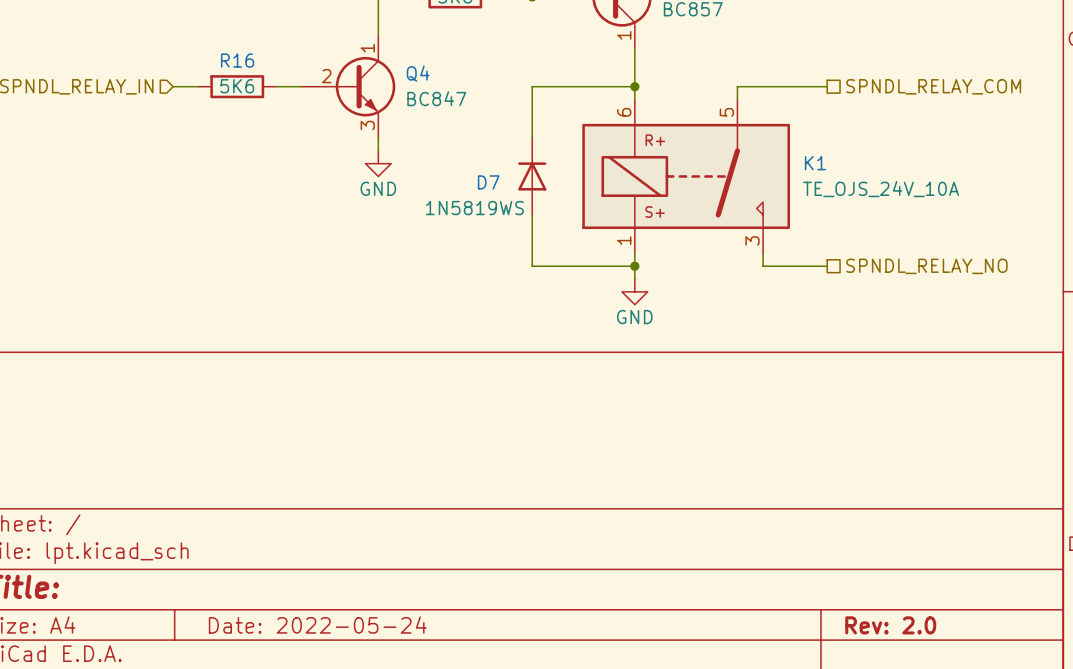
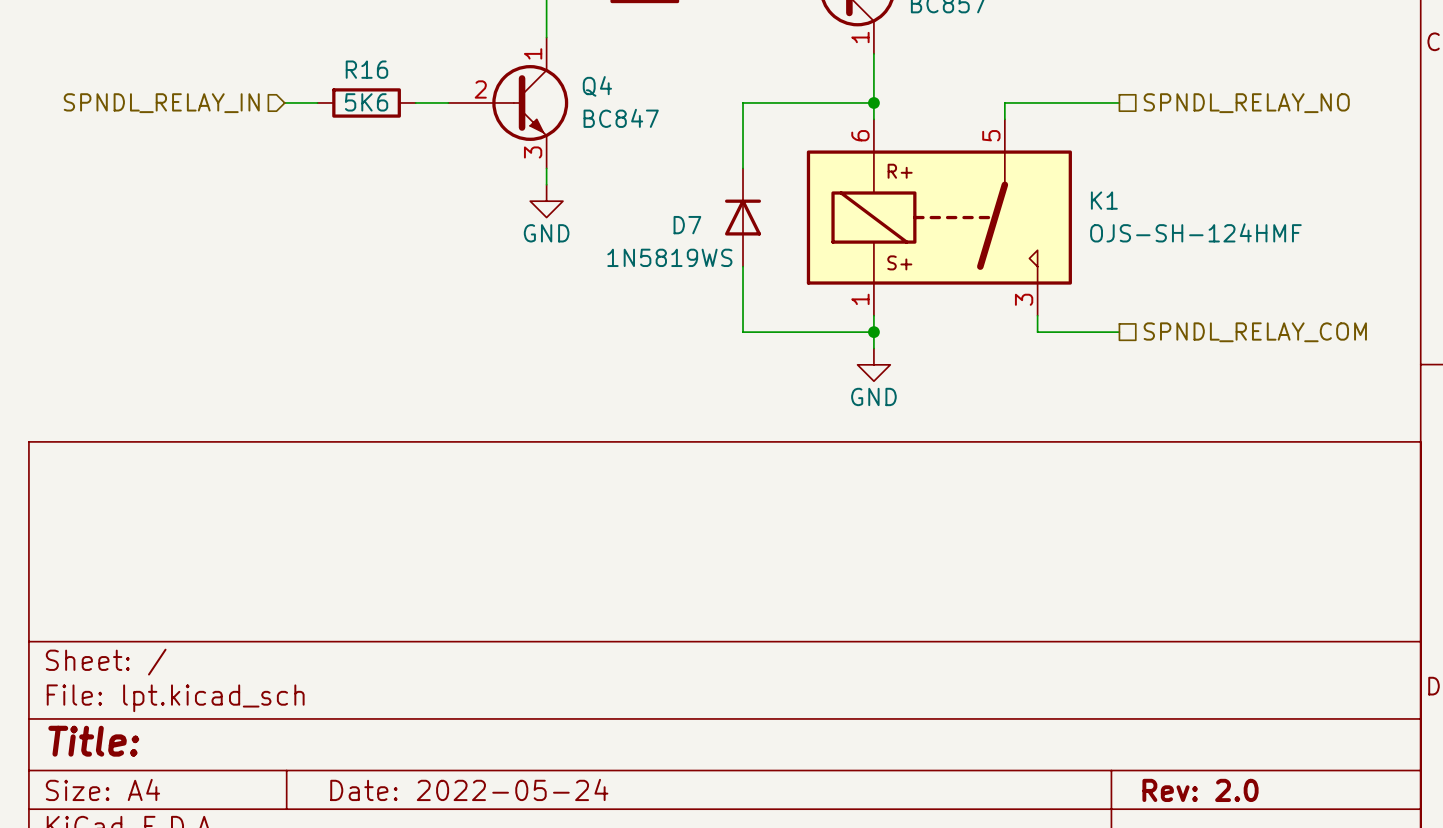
hierarchical label: SPNDL_RELAY_COM (933, 86) -> SPNDL_RELAY_NO (1246, 103)
K1 value: TE_OJS_24V_10A (881, 189) -> OJS-SH-124HMF (1195, 232)
hierarchical label: SPNDL_RELAY_NO (926, 266) -> SPNDL_RELAY_COM (1255, 332)

